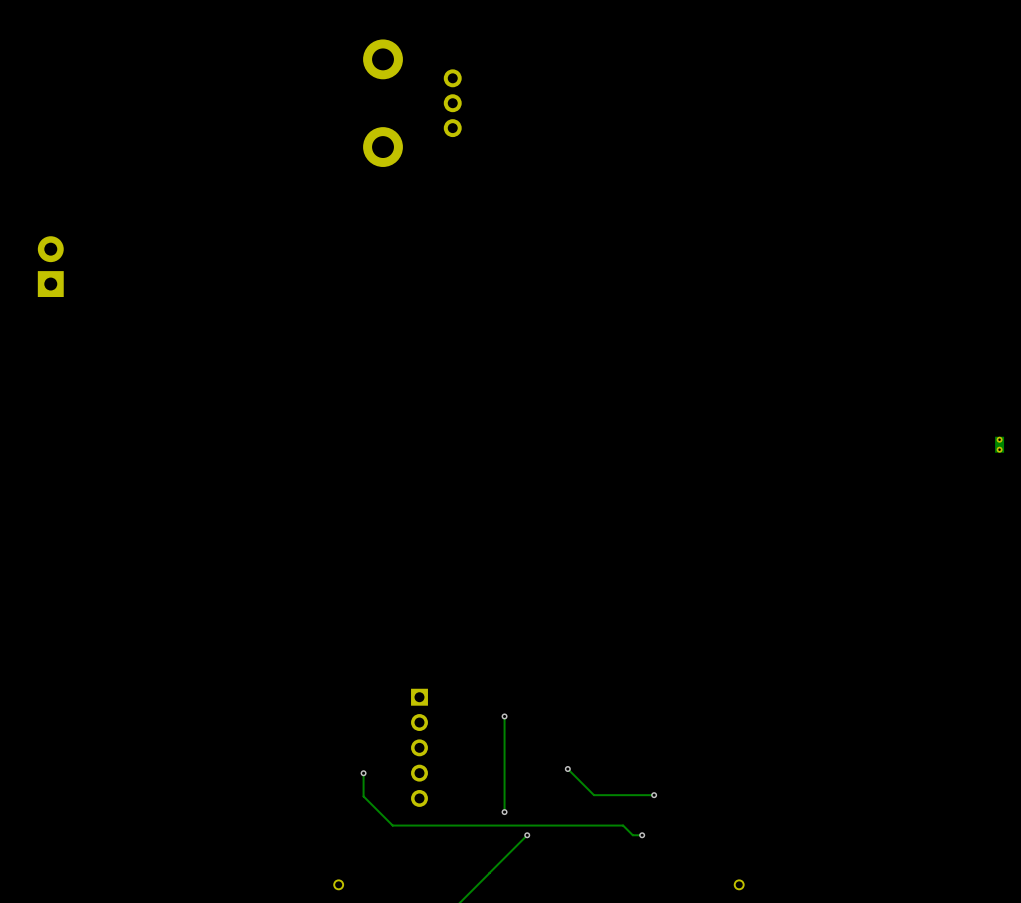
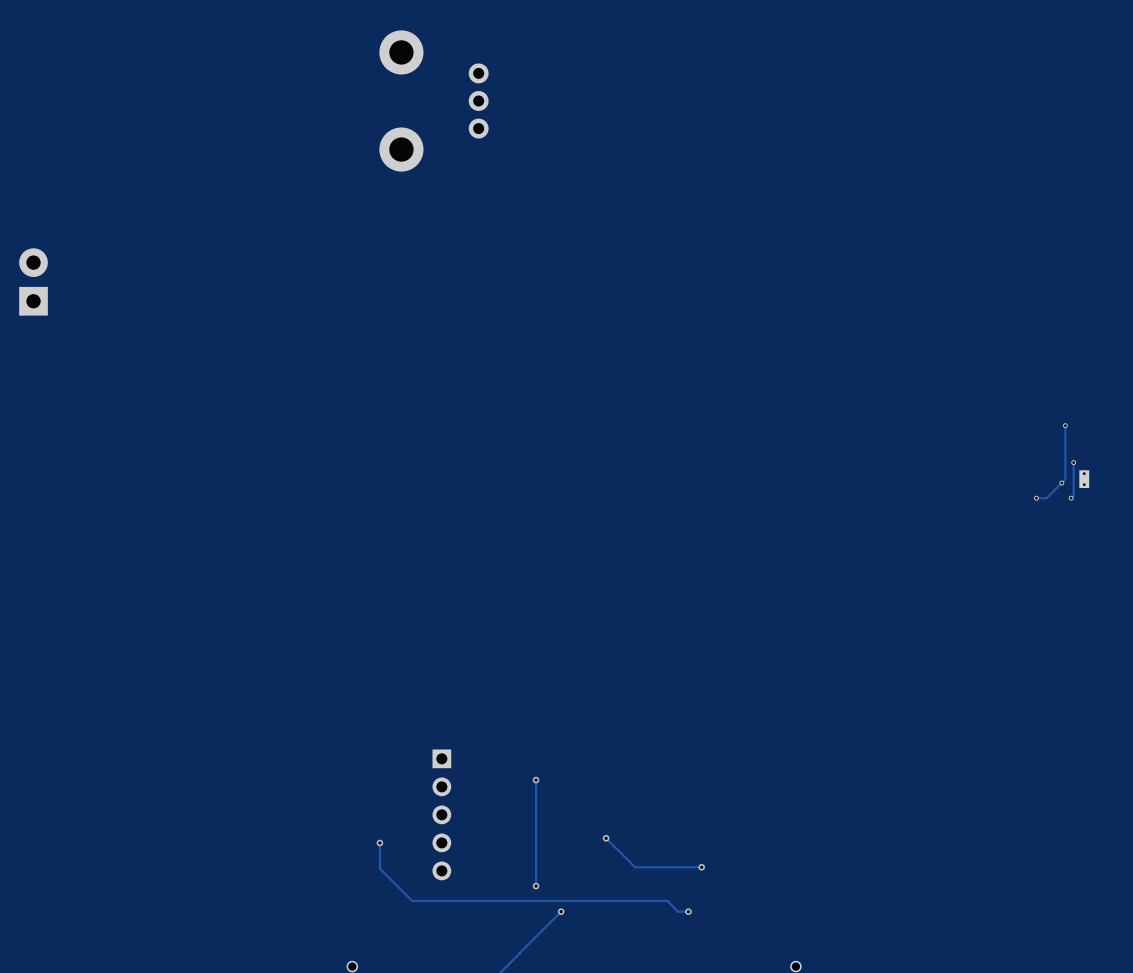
track: none -> (1065, 425) (1065, 479) (1046, 498) (1036, 498)
via: none -> (1065, 425)
track: none -> (1073, 462) (1073, 495) (1071, 498)
via: none -> (1073, 462)
via: none -> (1061, 483)
via: none -> (1036, 498)
via: none -> (1071, 498)

